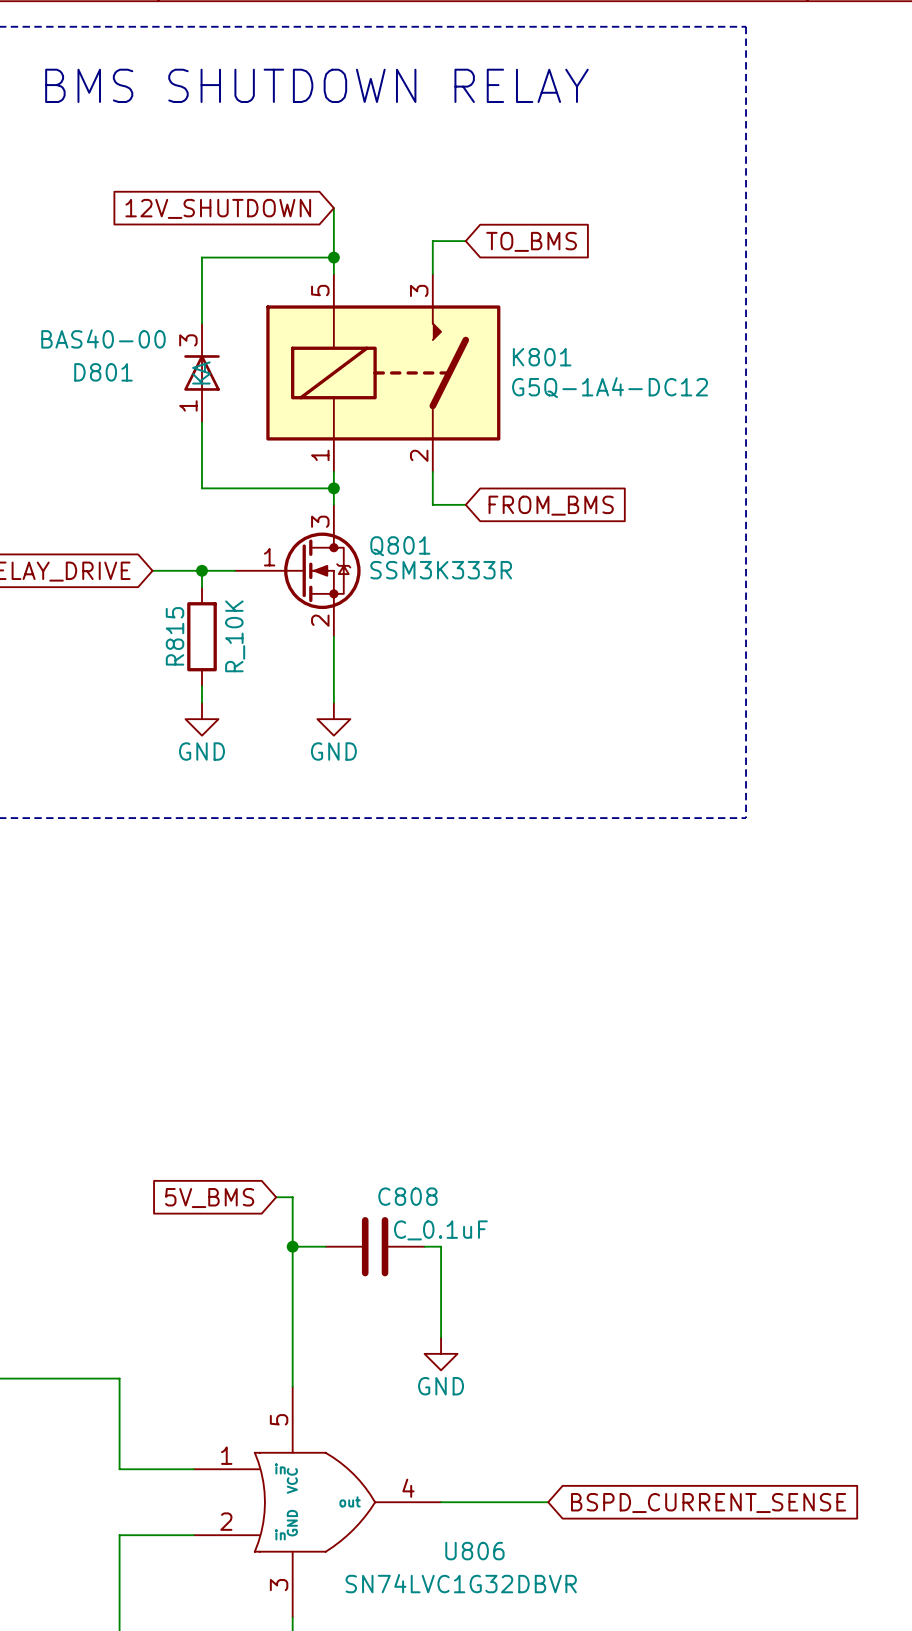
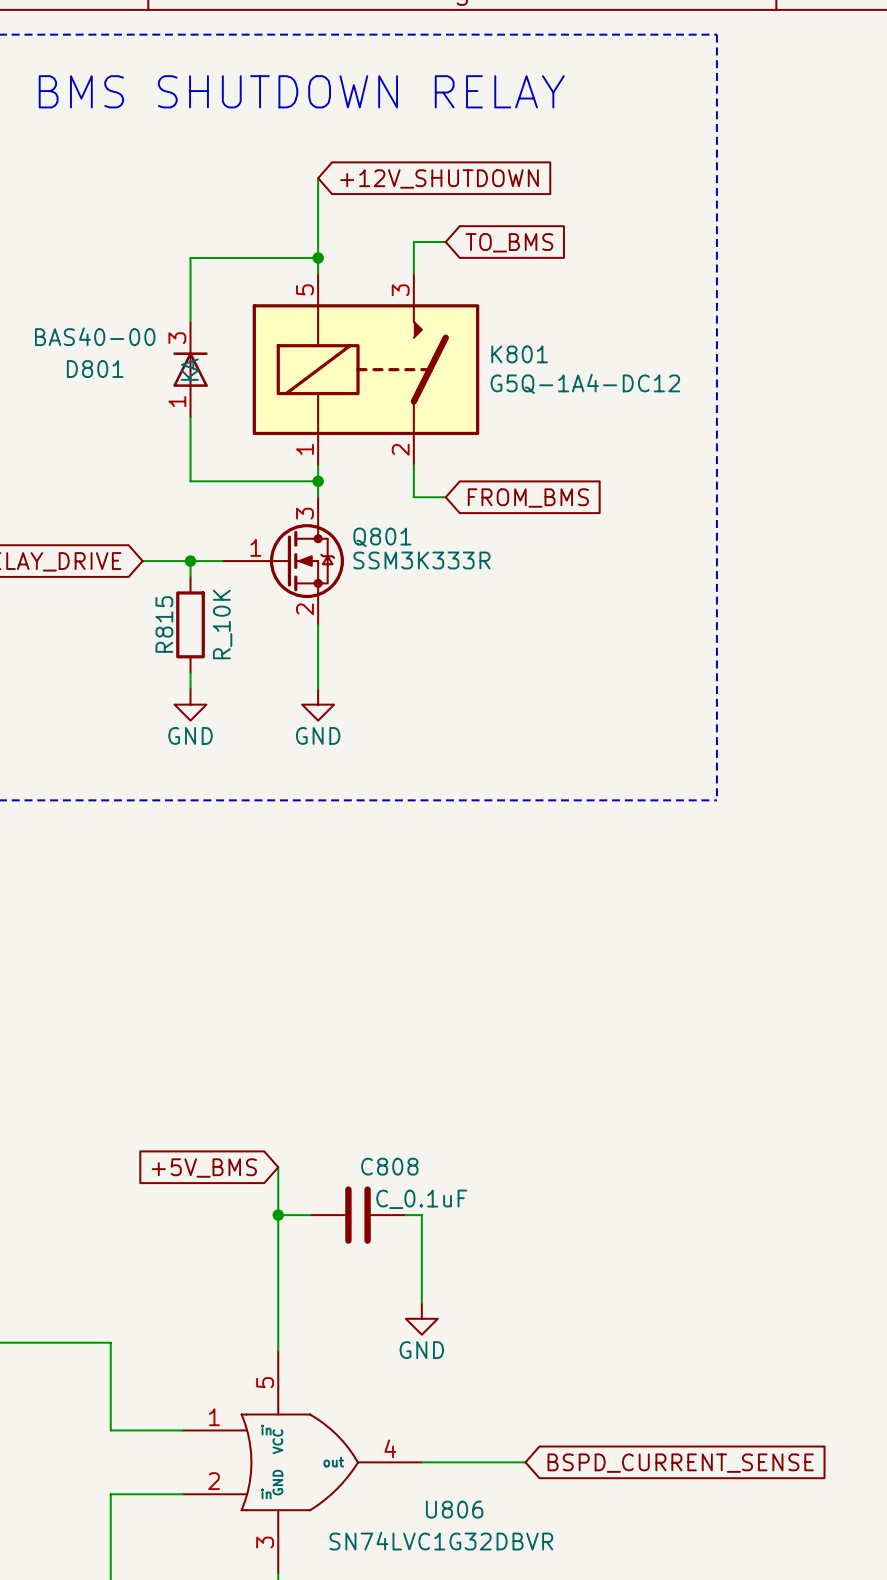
wire: none -> (318, 178) (318, 210)
global label: 12V_SHUTDOWN (218, 208) -> +12V_SHUTDOWN (439, 178)
wire: (276, 1197) (292, 1197) -> none
global label: 5V_BMS (209, 1198) -> +5V_BMS (204, 1168)

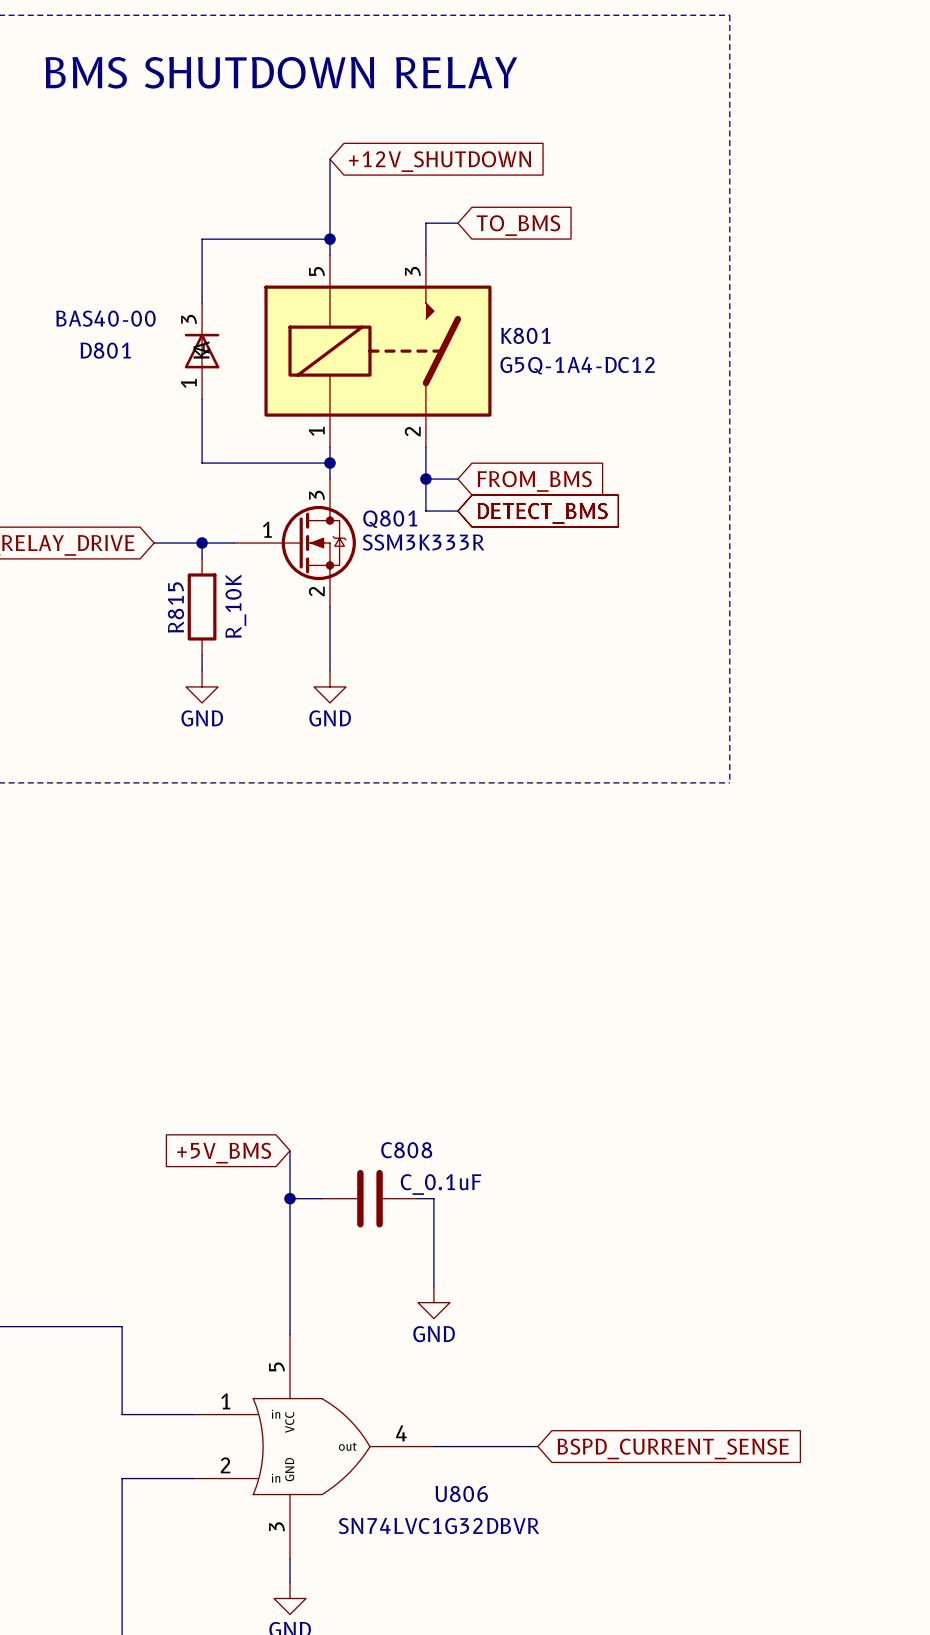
wire: none -> (425, 479) (425, 511) (457, 511)
junction: none -> (425, 479)
global label: none -> DETECT_BMS (542, 513)

